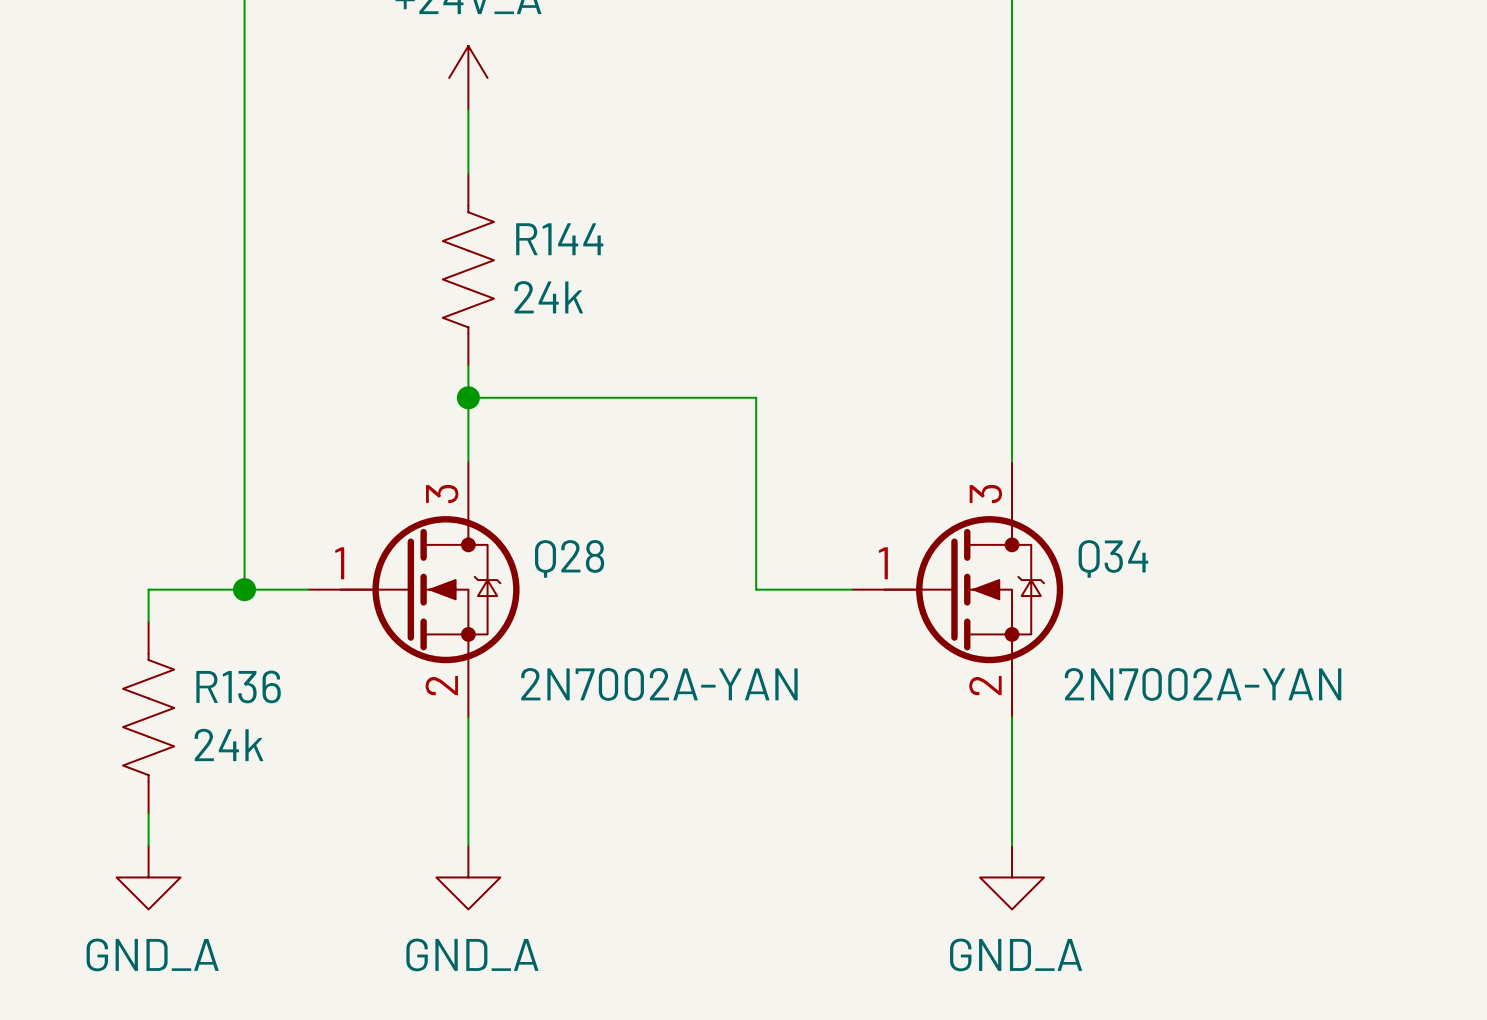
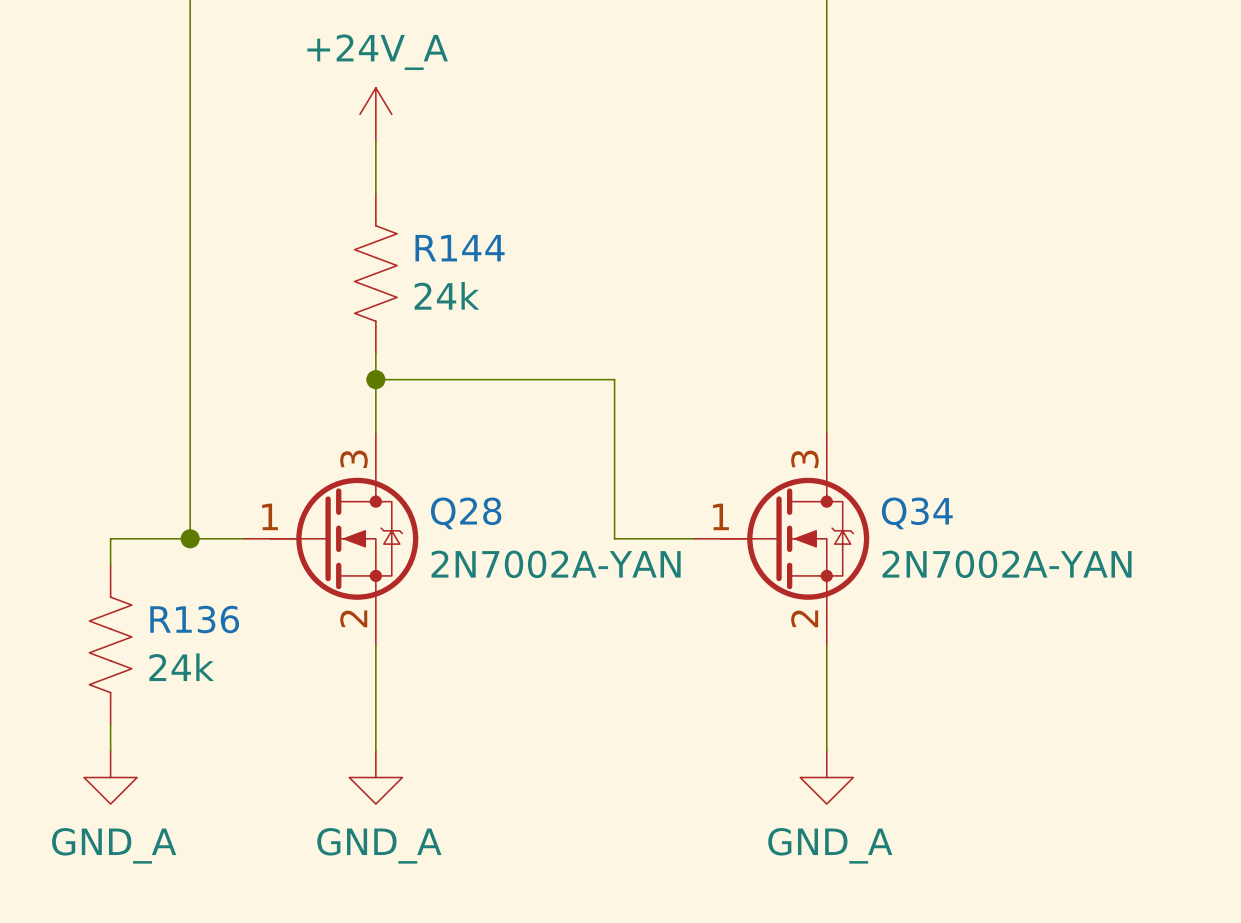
Q28 value position: 2N7002A-YAN (659, 684) -> 2N7002A-YAN (556, 564)
Q34 value position: 2N7002A-YAN (1203, 684) -> 2N7002A-YAN (1007, 564)

